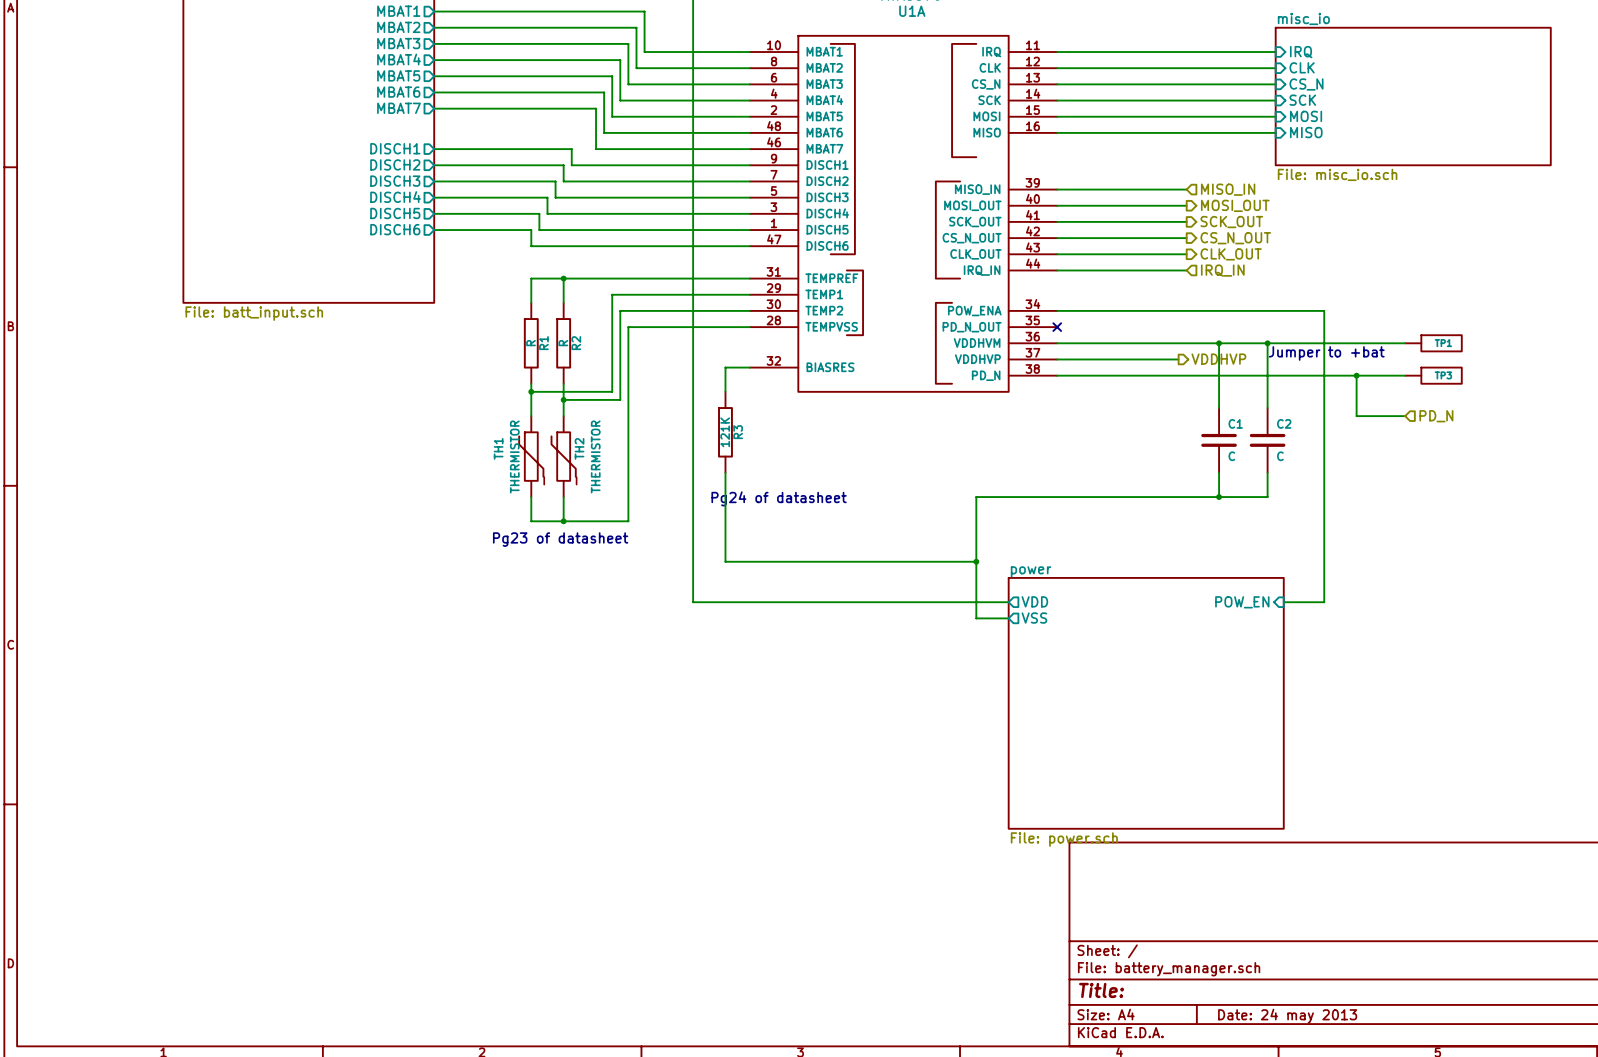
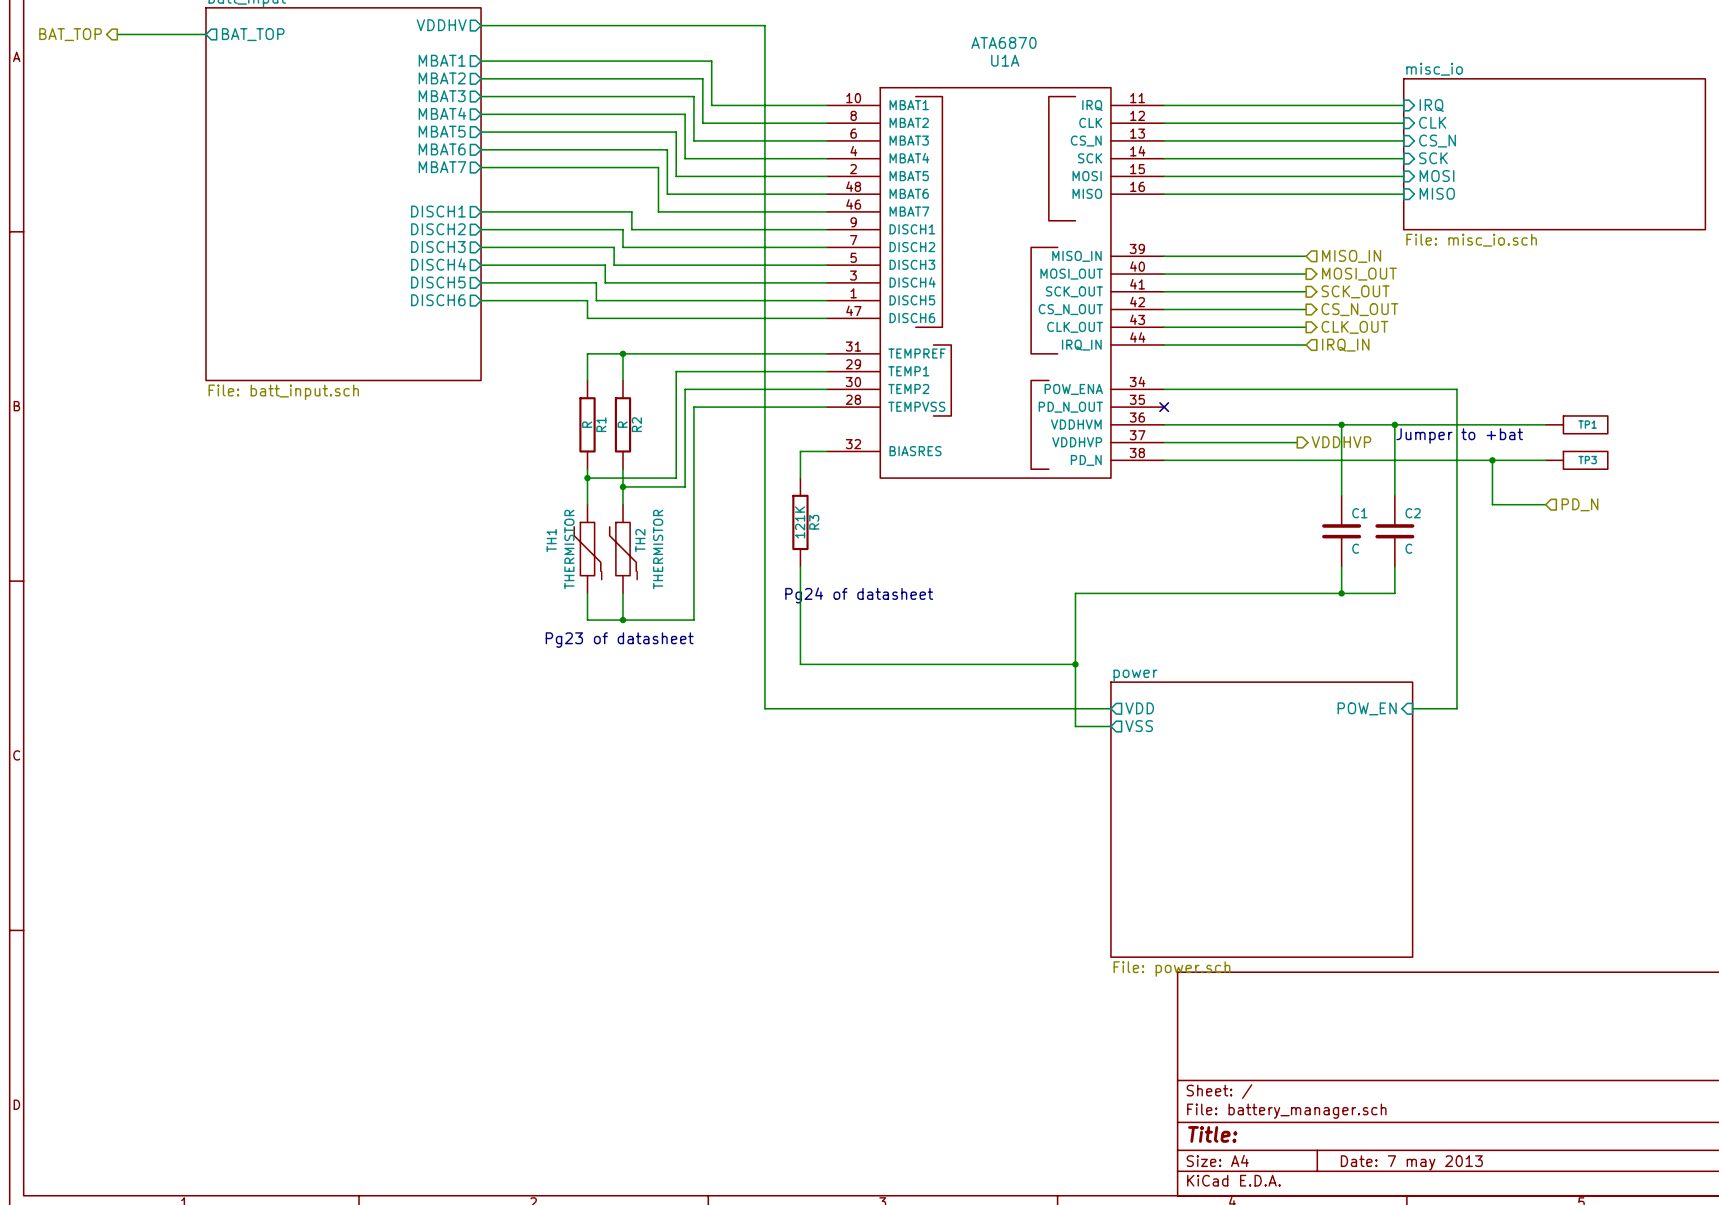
title block: Date: 24 may 2013 (1287, 1016) -> Date: 7 may 2013 (1411, 1162)

